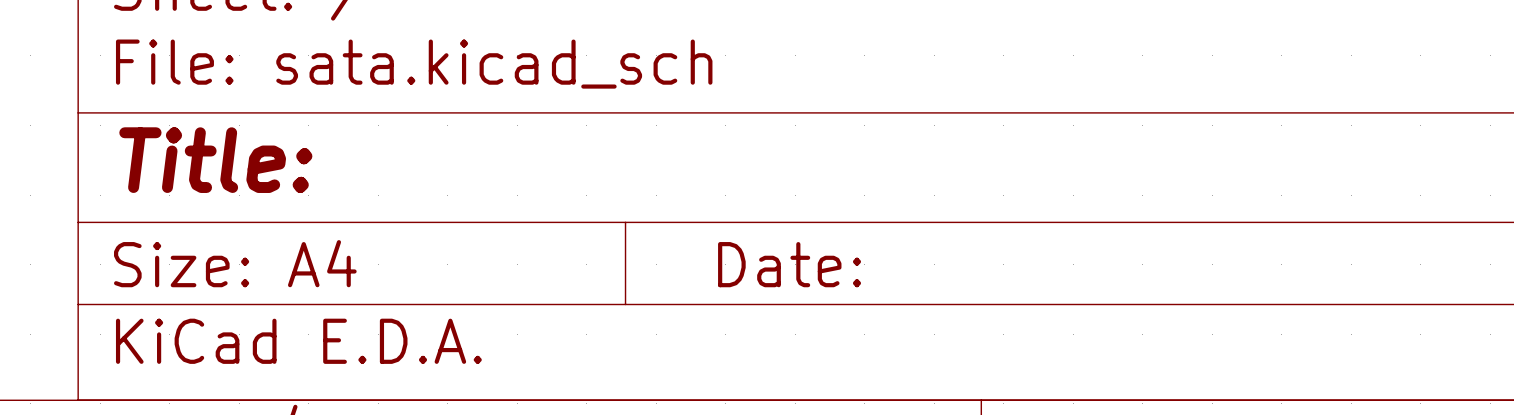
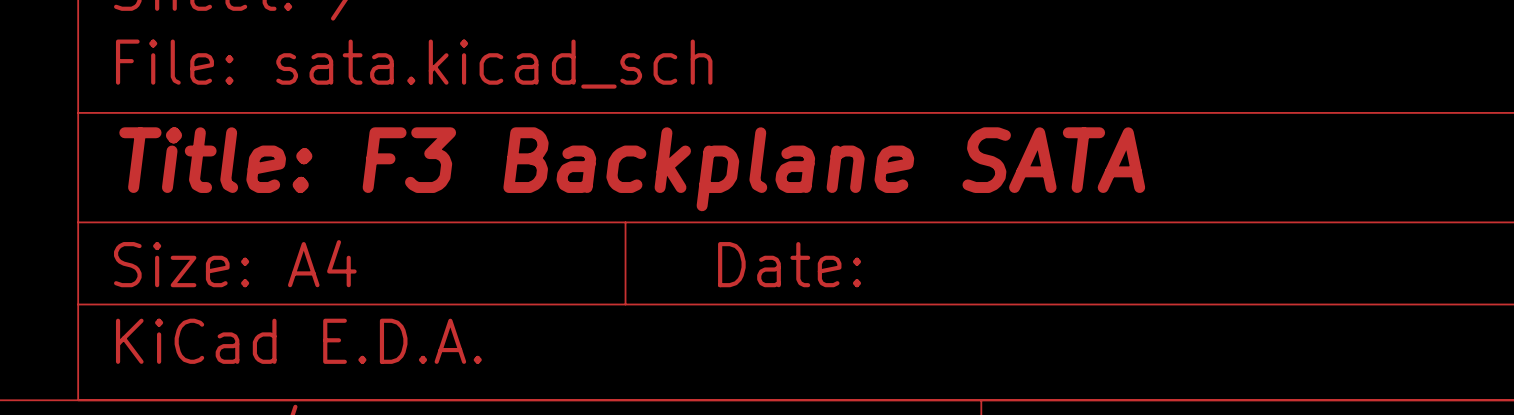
title block: Title: (215, 160) -> Title: F3 Backplane SATA (632, 169)

